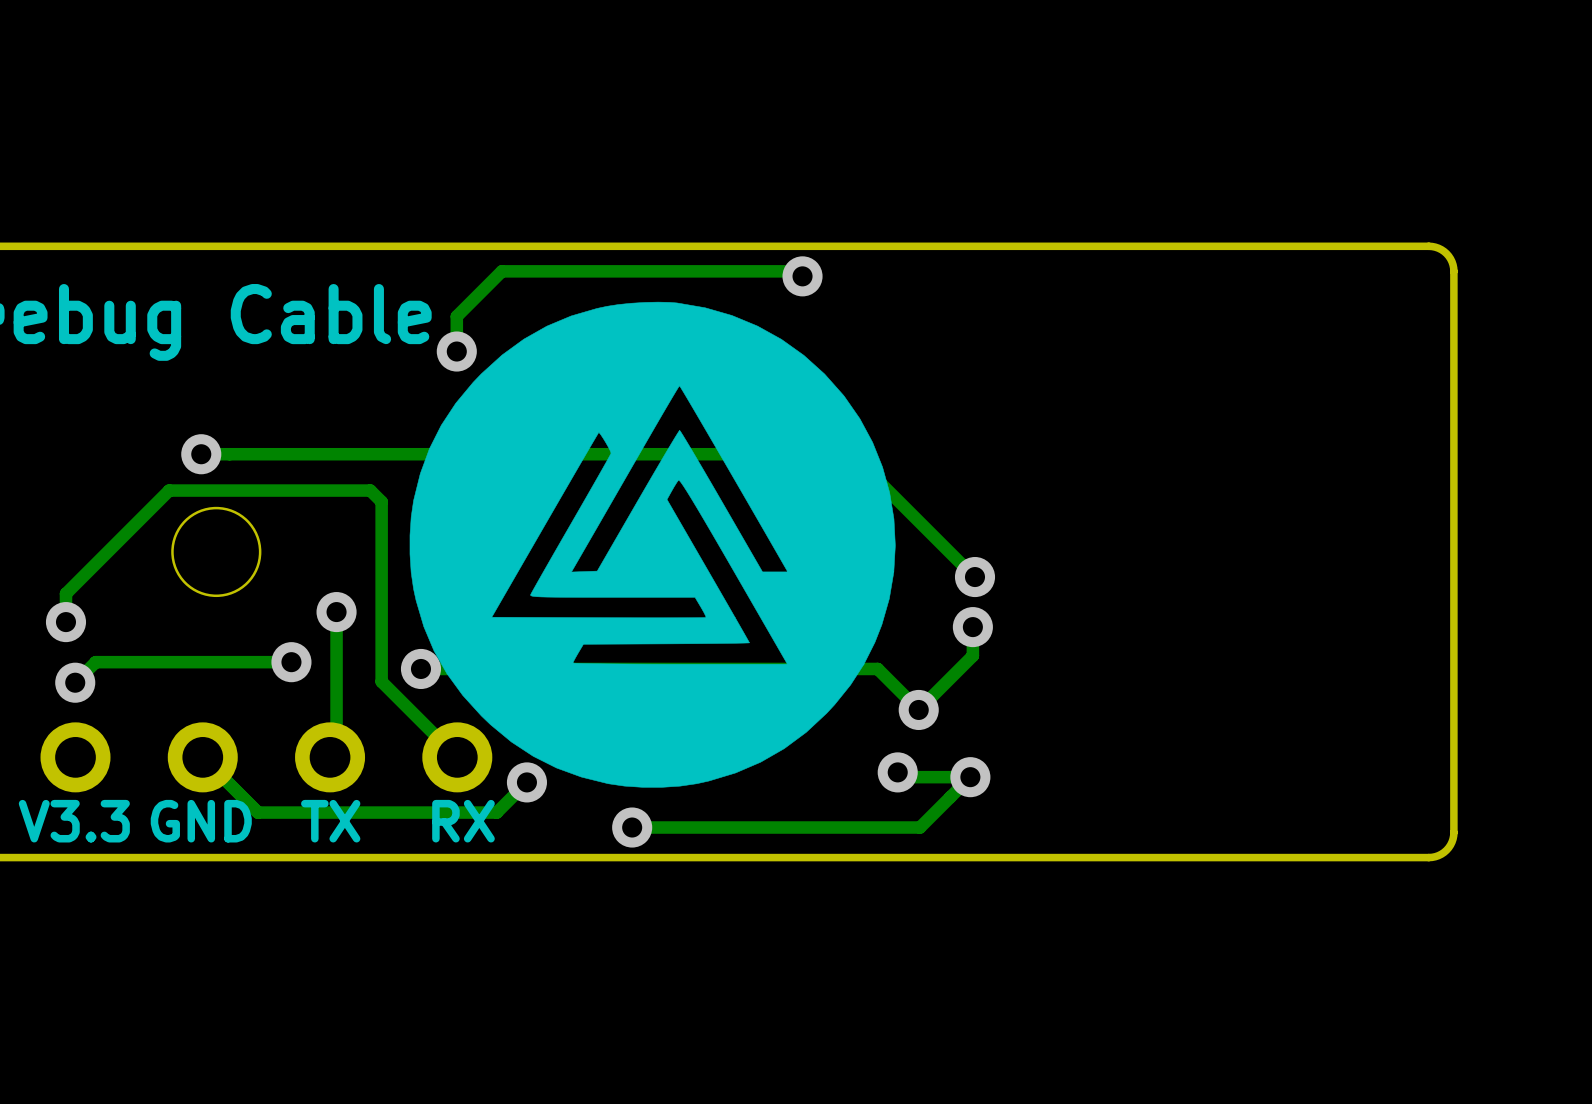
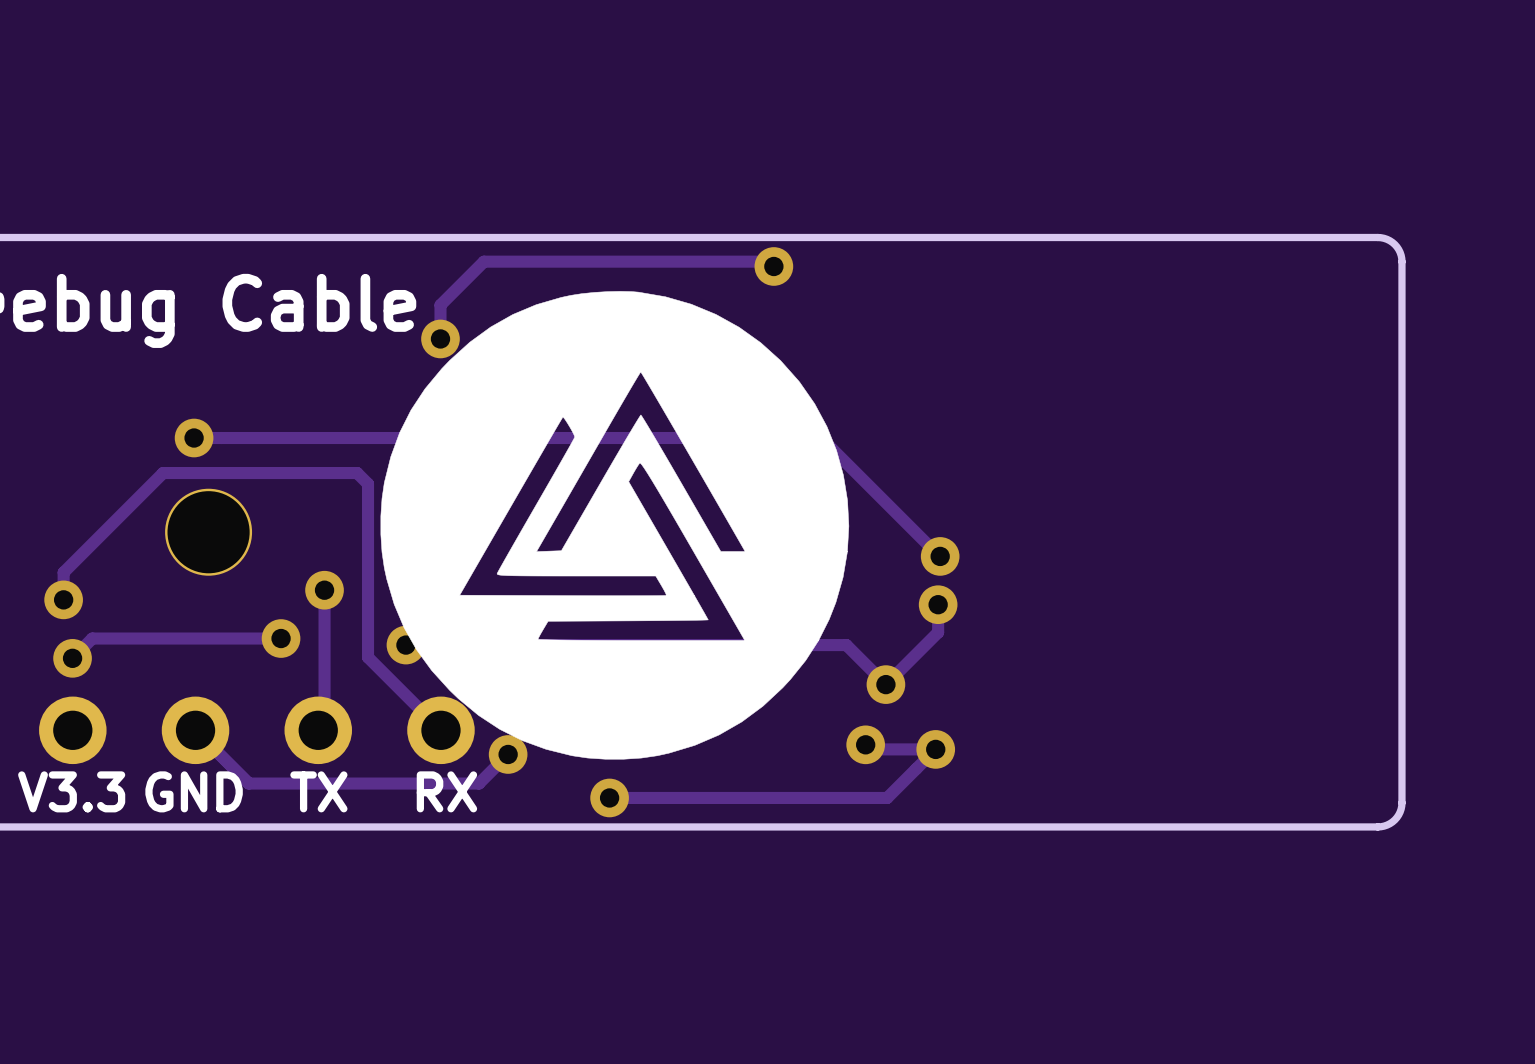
drawing position: (652, 544) -> (614, 525)

